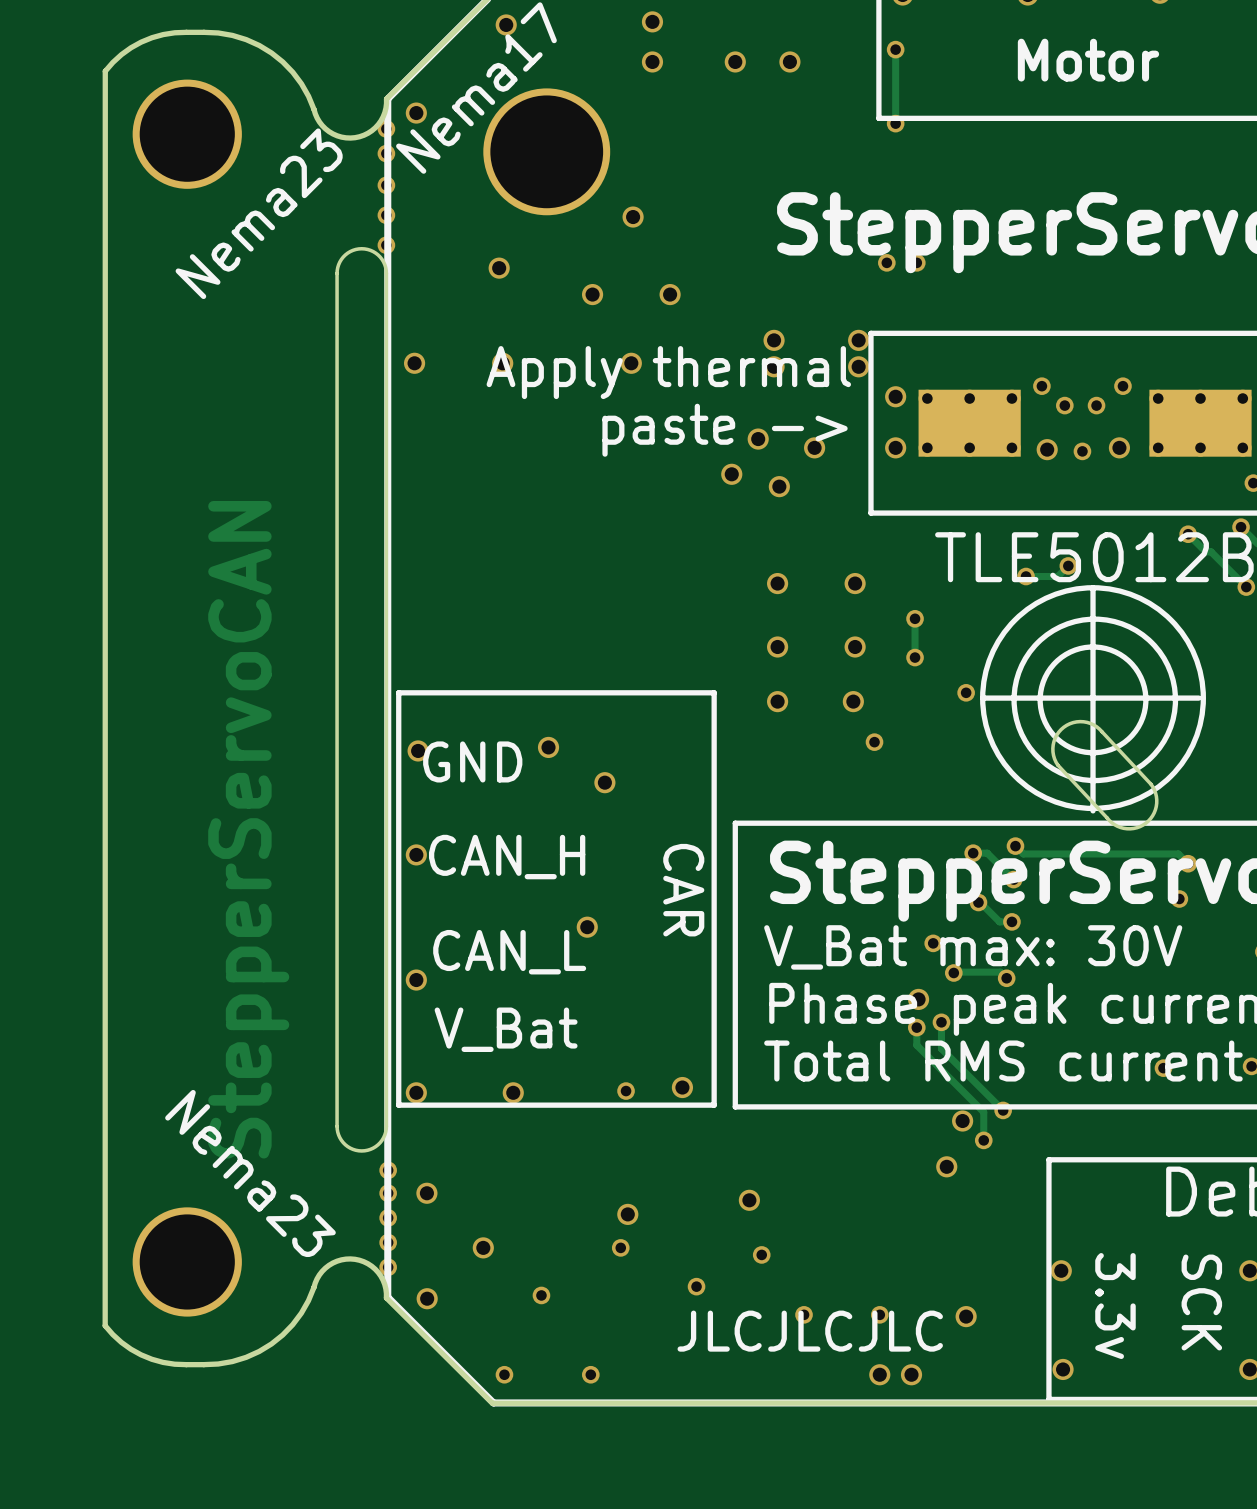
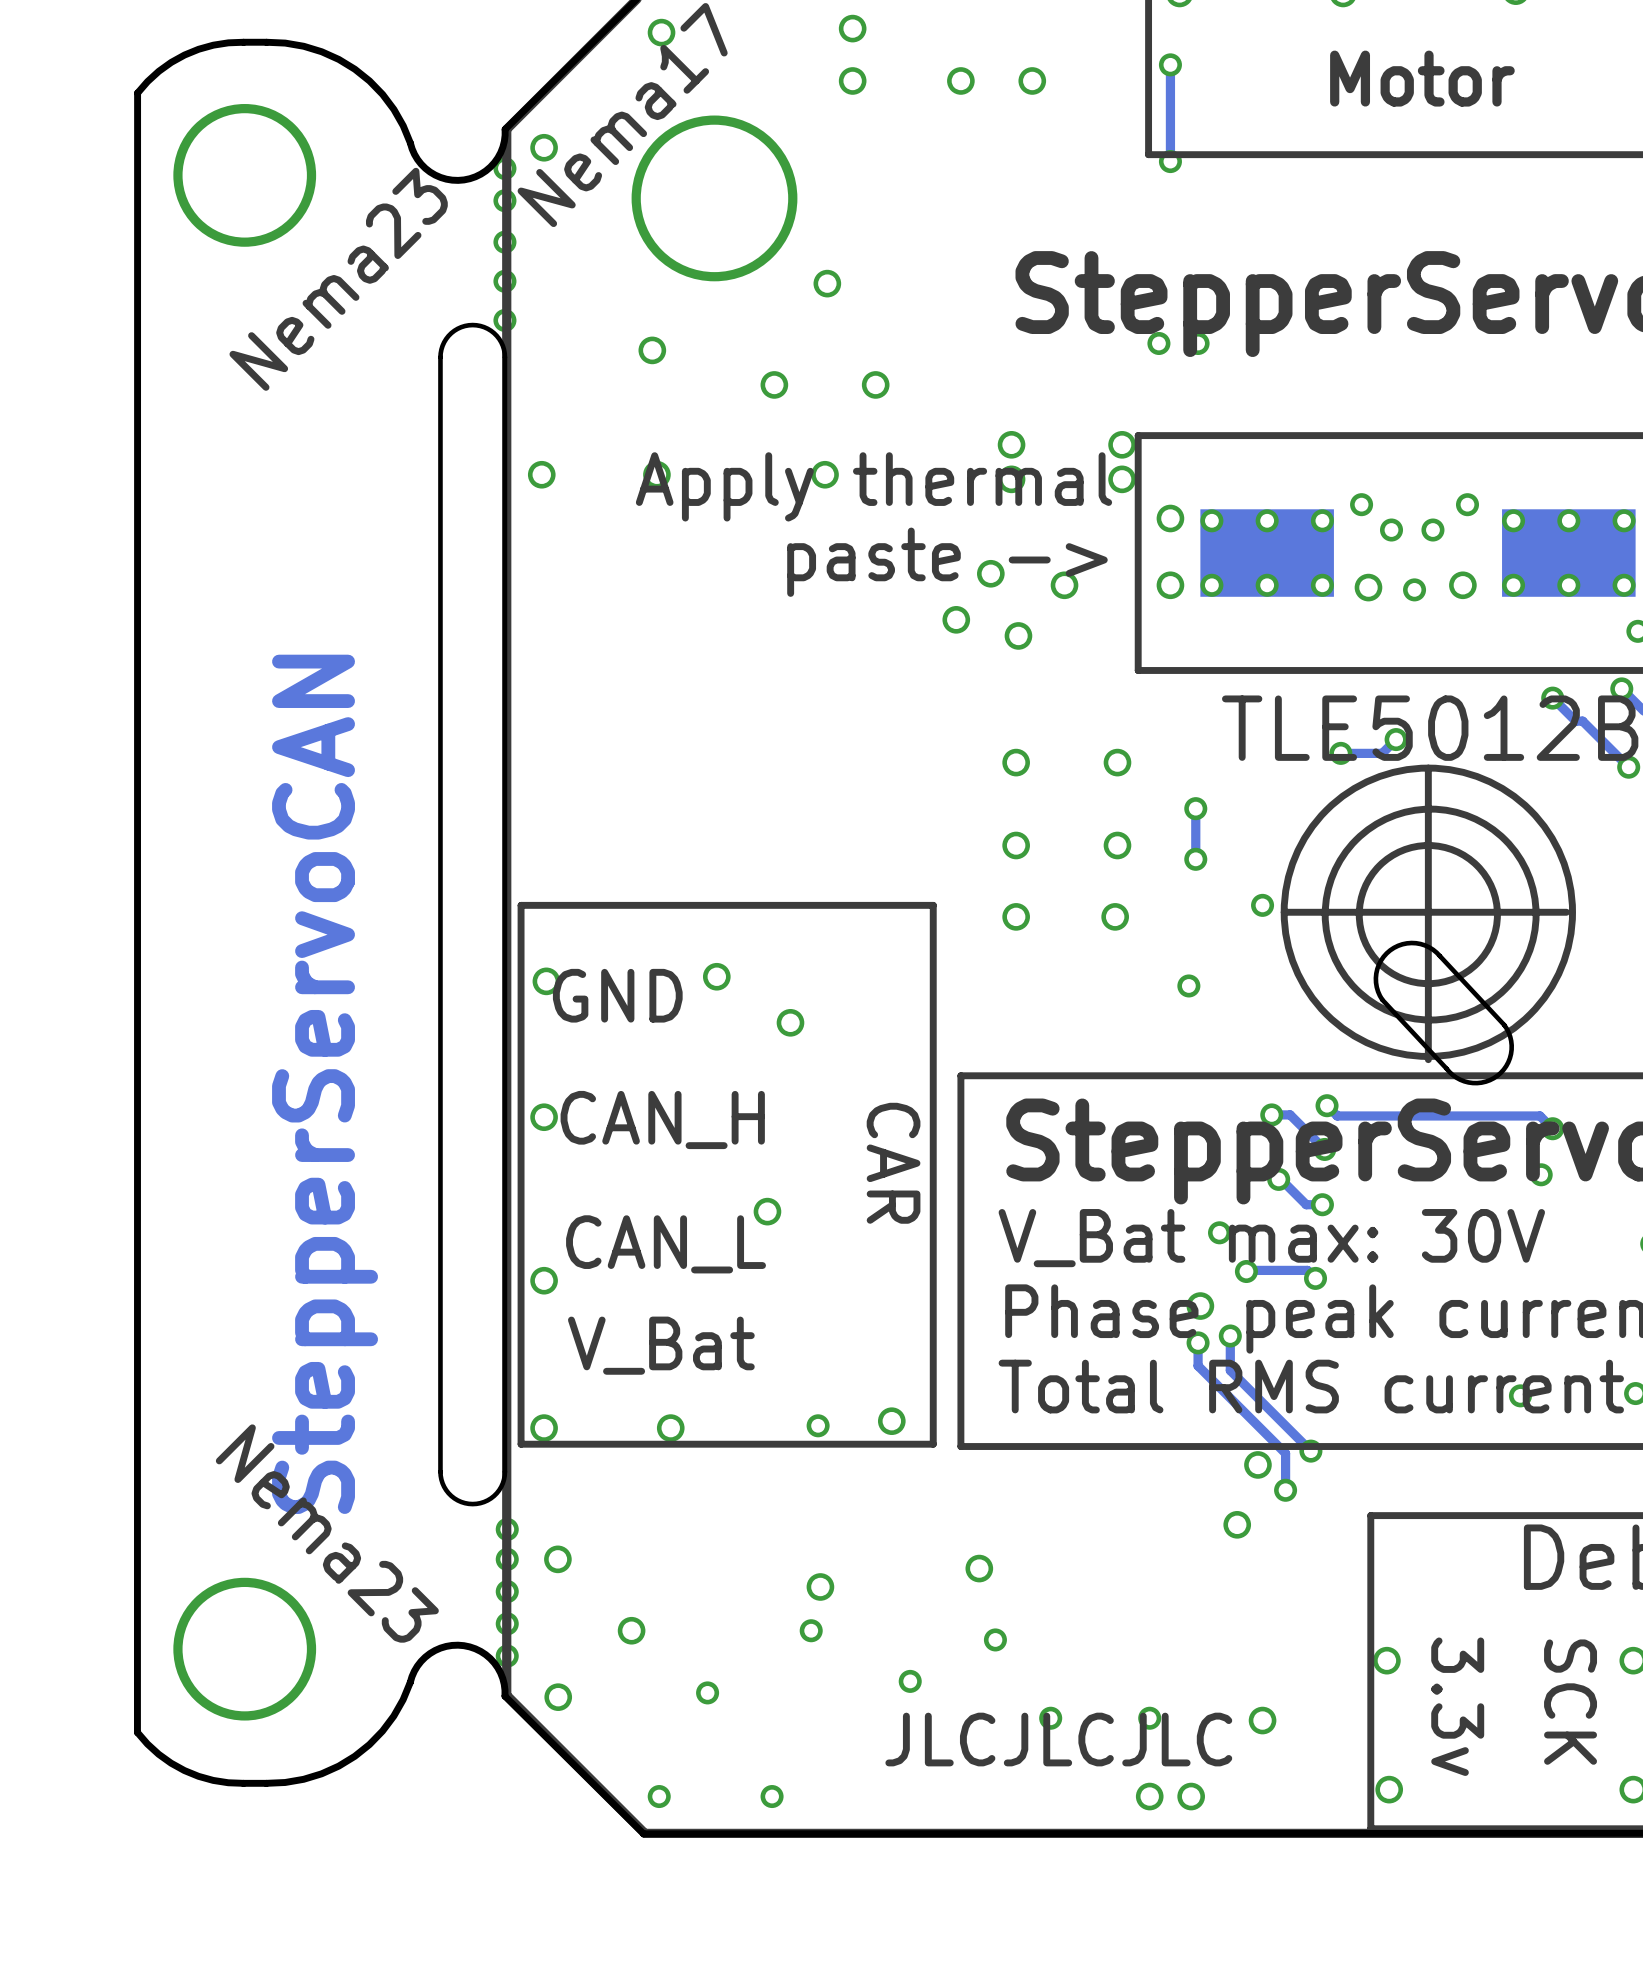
via position: (874, 742) -> (1188, 985)

